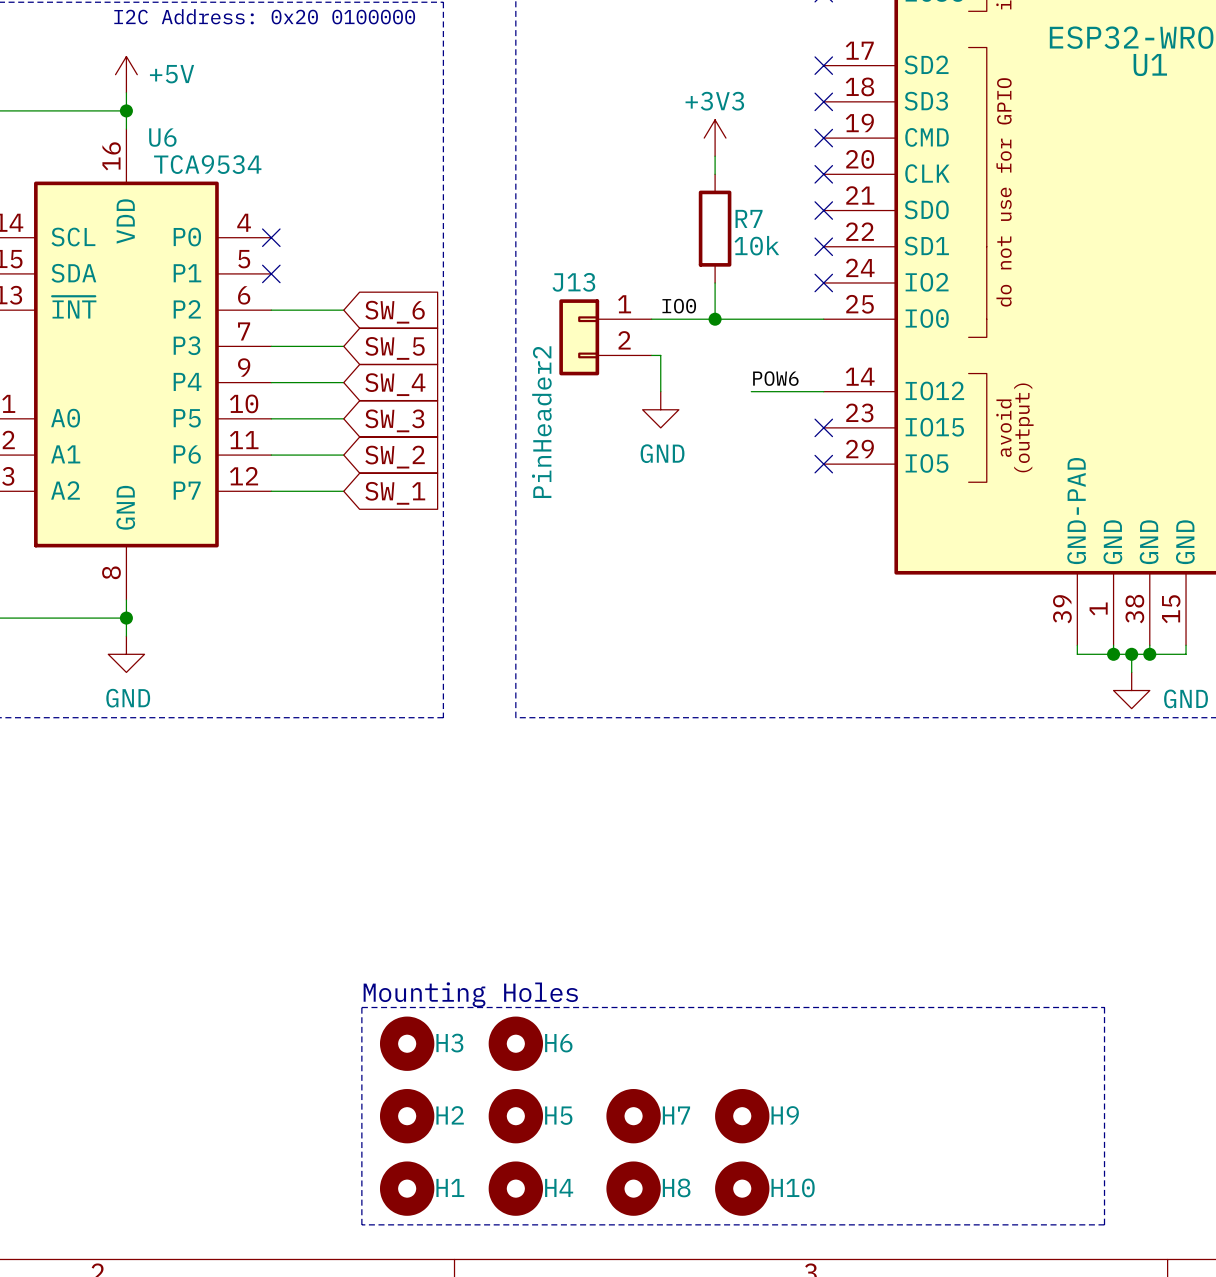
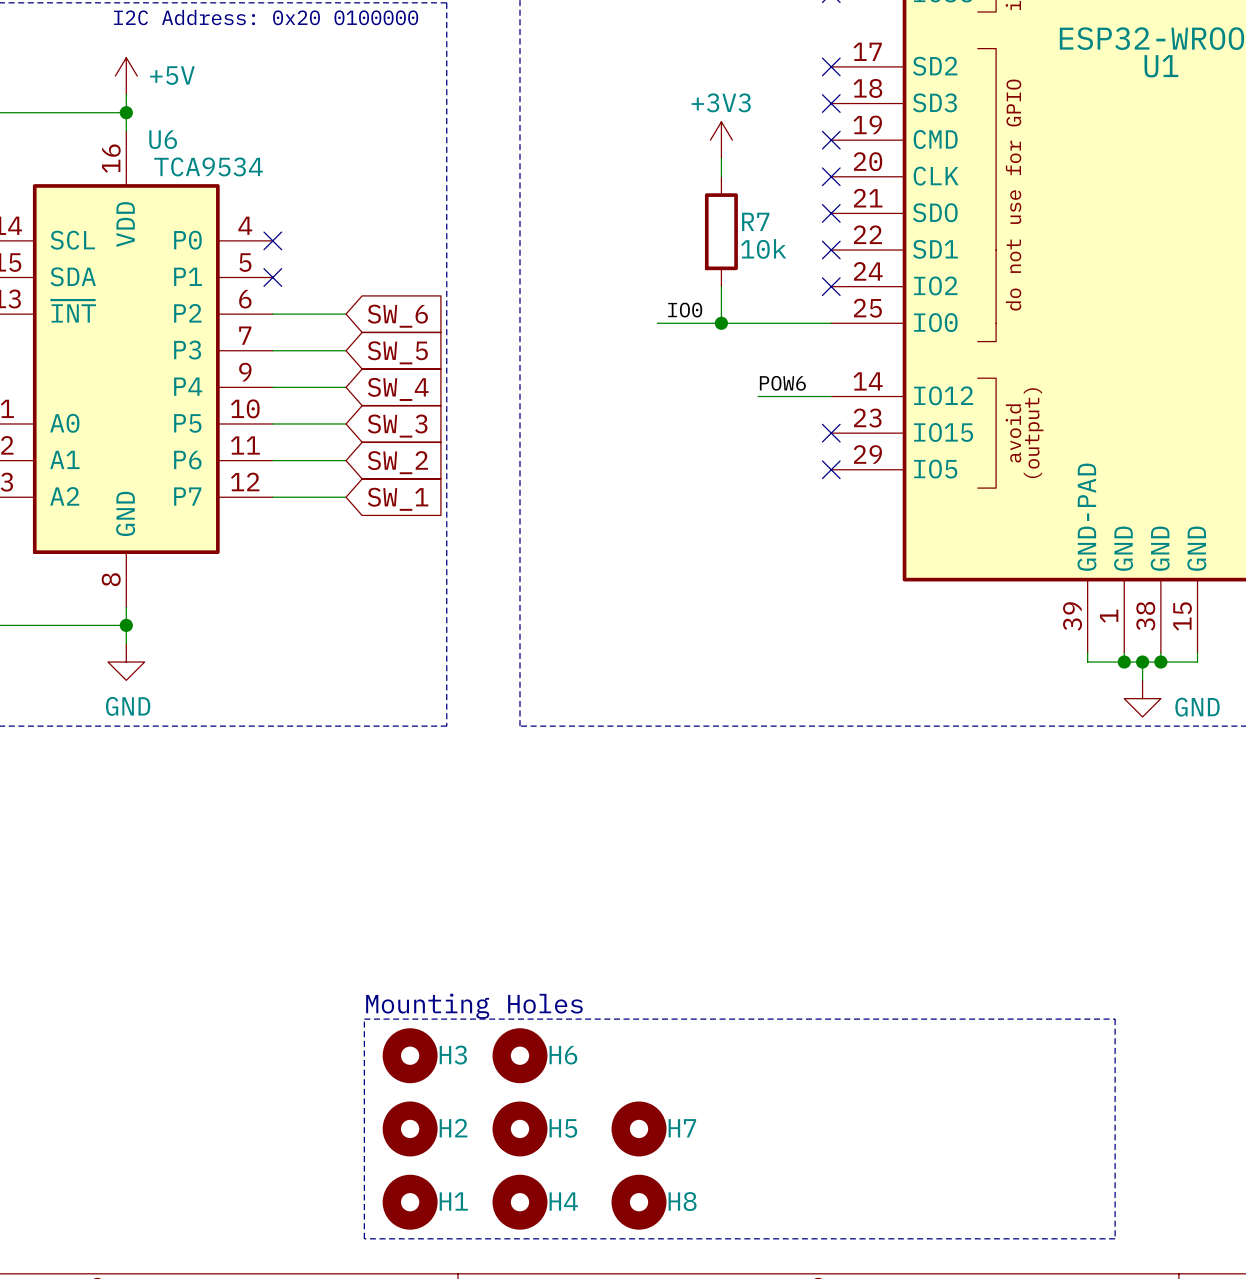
J13: PinHeader2 (605, 337) -> none
wire: (651, 355) (660, 355) (660, 391) -> none
power symbol: GND (660, 409) -> none
H9: (742, 1116) -> none
H10: (742, 1188) -> none

